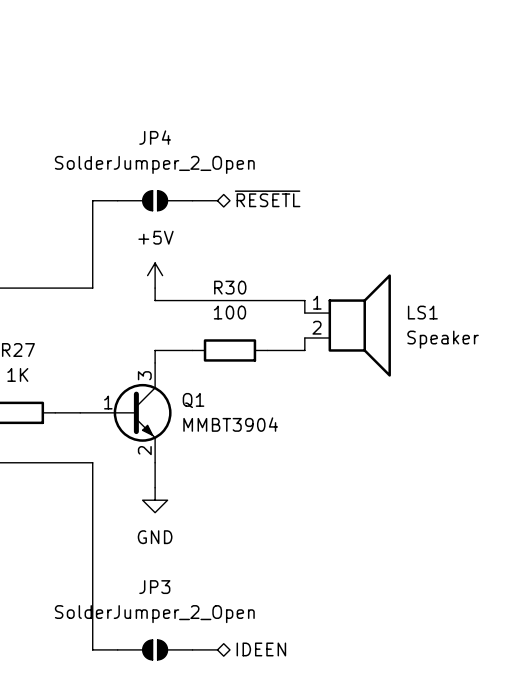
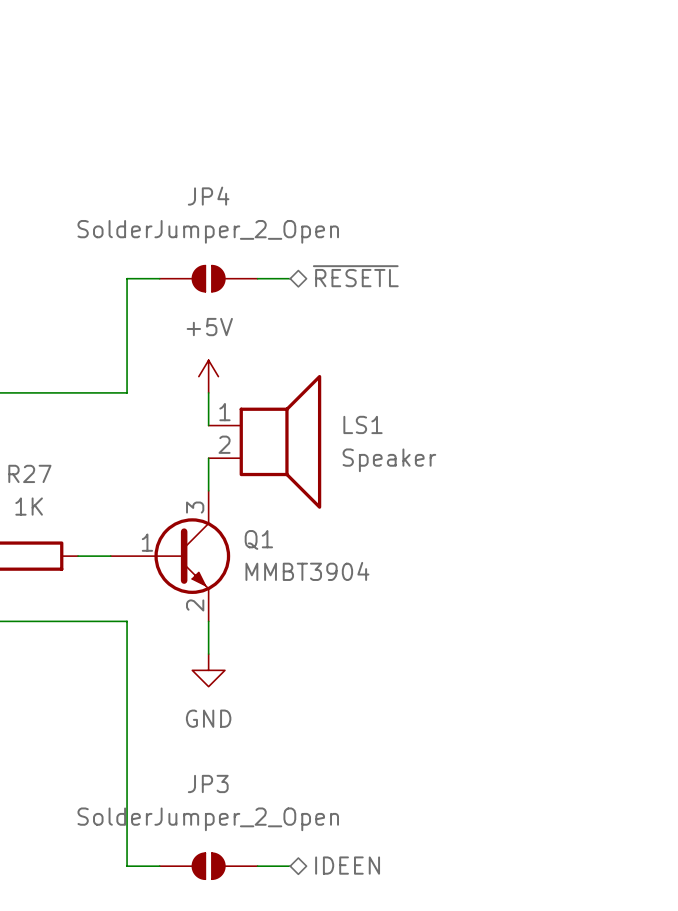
wire: (155, 300) (304, 300) (304, 313) -> (208, 409) (208, 425)
LS1 position: (347, 325) -> (264, 441)
wire: (304, 337) (304, 350) (267, 350) -> none
wire: (155, 350) (192, 350) -> (208, 474) (208, 458)
R30: 100 (229, 350) -> none

